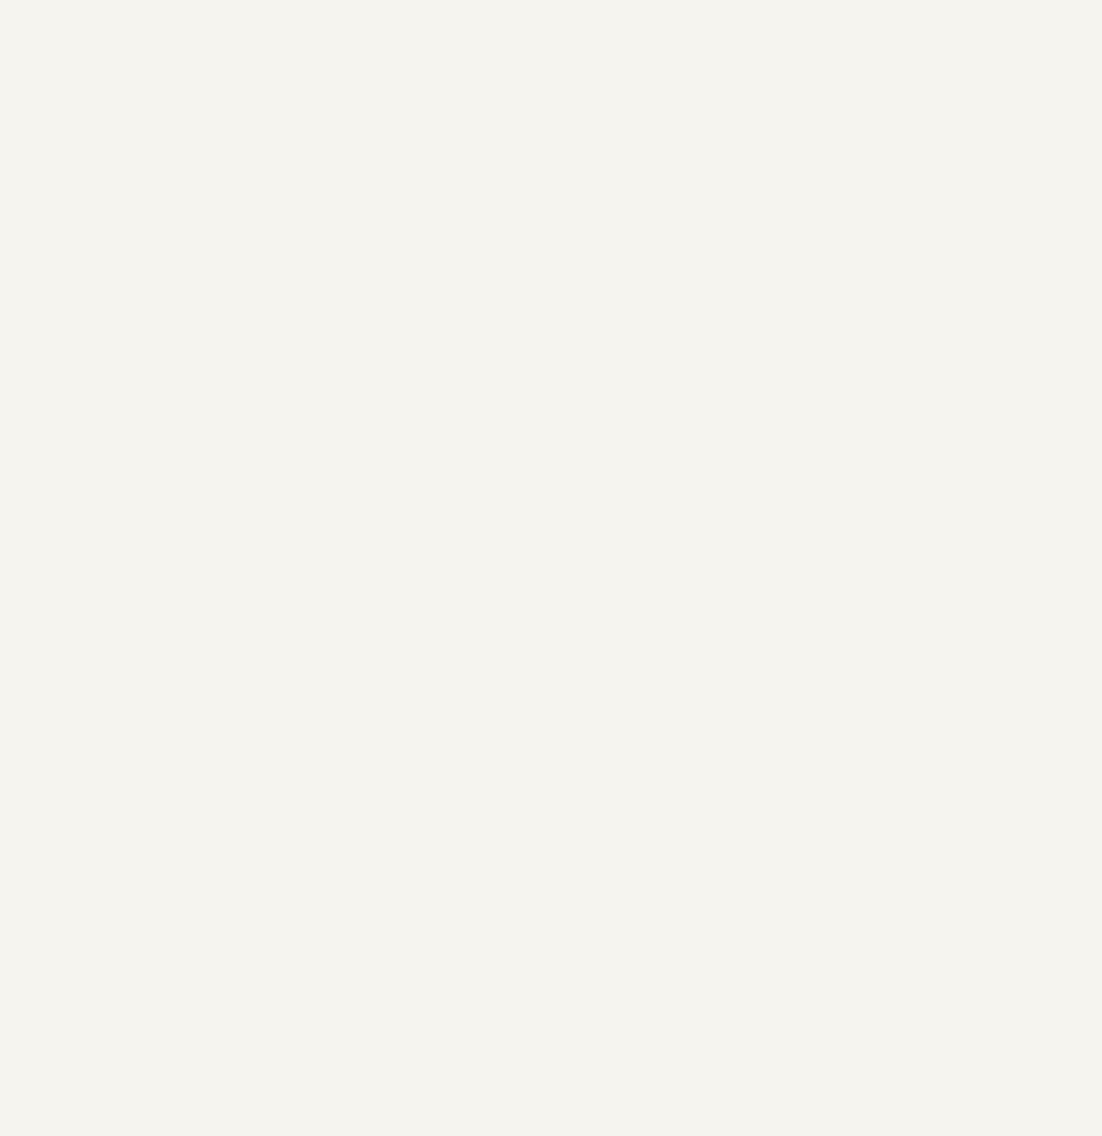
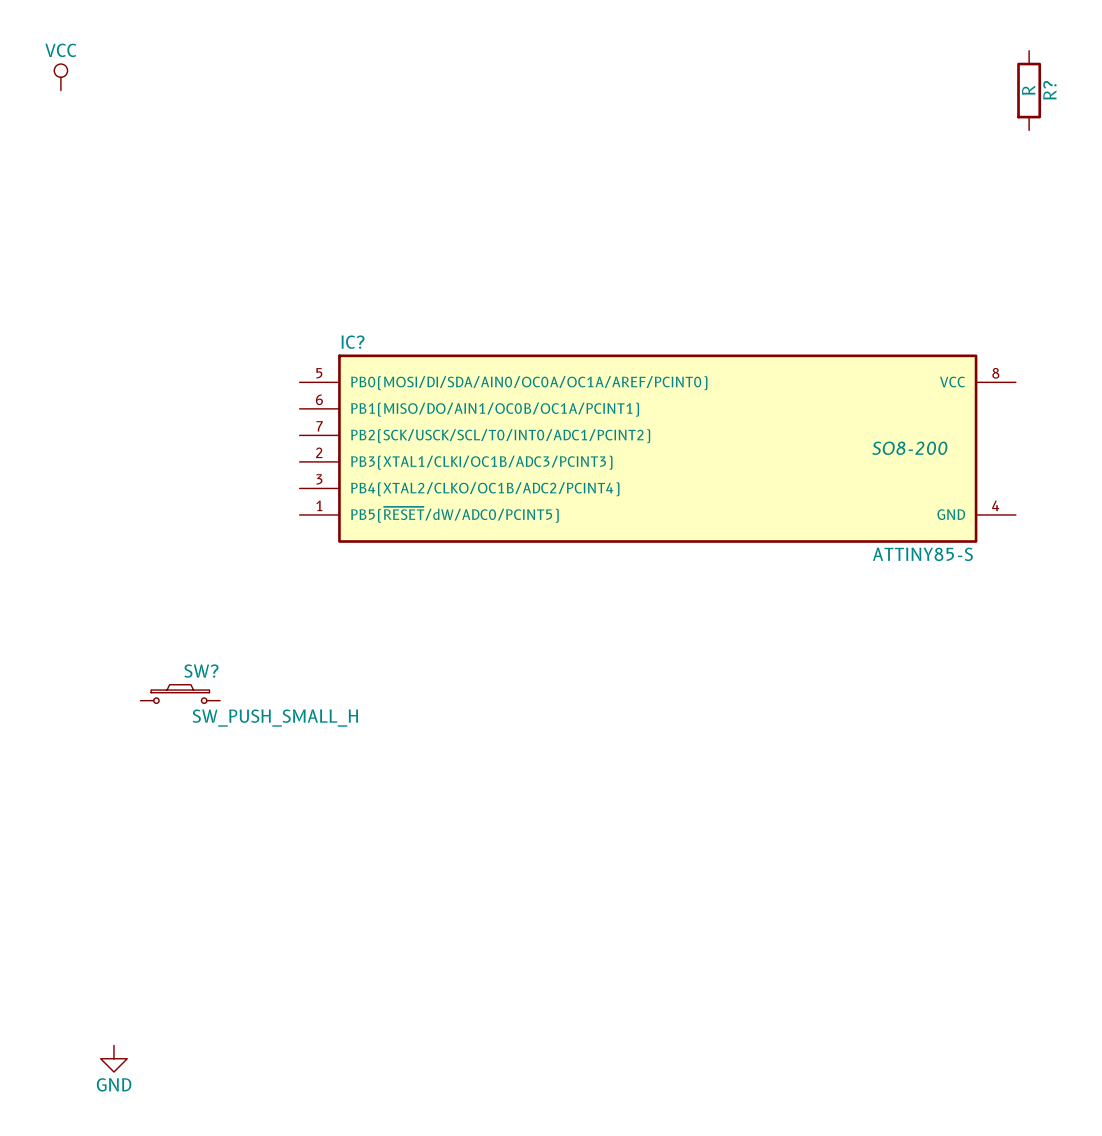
power symbol: none -> VCC (60, 77)
R?: none -> R (1029, 90)
IC?: none -> ATTINY85-S (657, 448)
SW?: none -> SW_PUSH_SMALL_H (180, 694)
power symbol: none -> GND (113, 1058)

